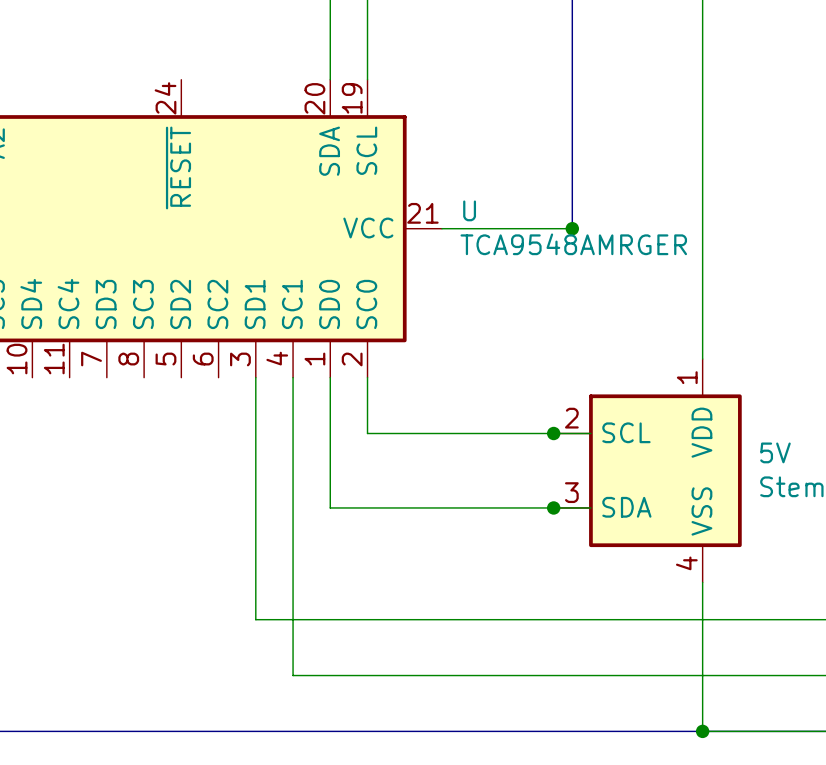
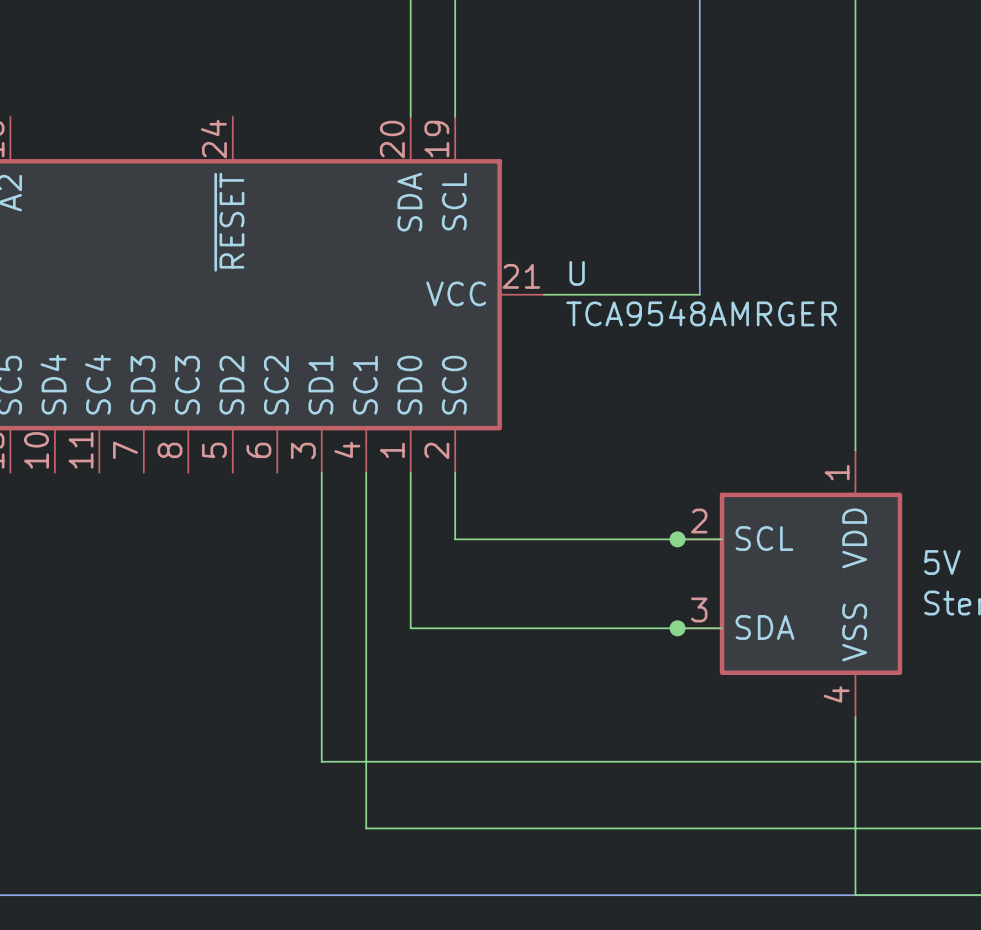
junction: (572, 228) -> none
junction: (702, 731) -> none

